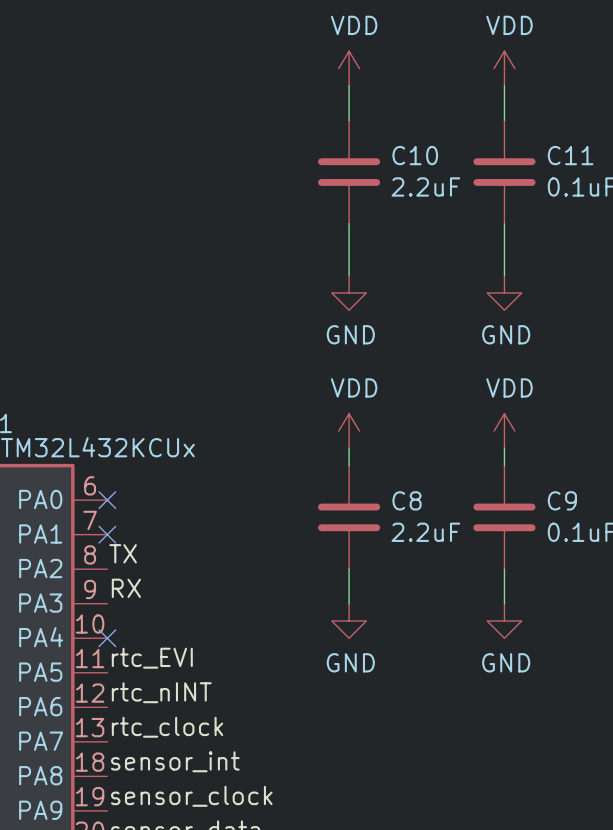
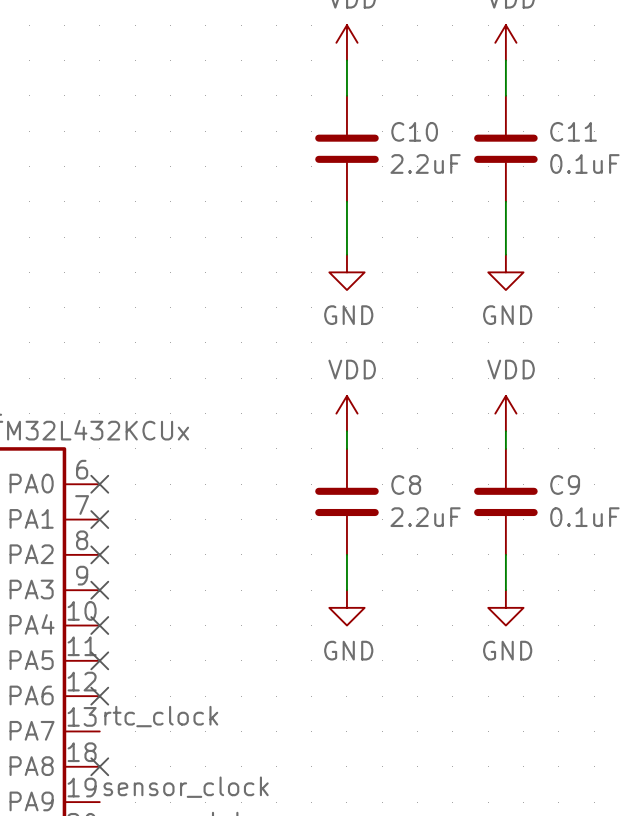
label: TX (123, 553) -> none
no-connect mark: none -> (99, 554)
label: RX (126, 588) -> none
no-connect mark: none -> (99, 590)
label: rtc_EVI (152, 658) -> none
no-connect mark: none -> (99, 660)
label: rtc_nINT (161, 692) -> none
no-connect mark: none -> (99, 696)
label: sensor_int (175, 761) -> none
no-connect mark: none -> (99, 766)

